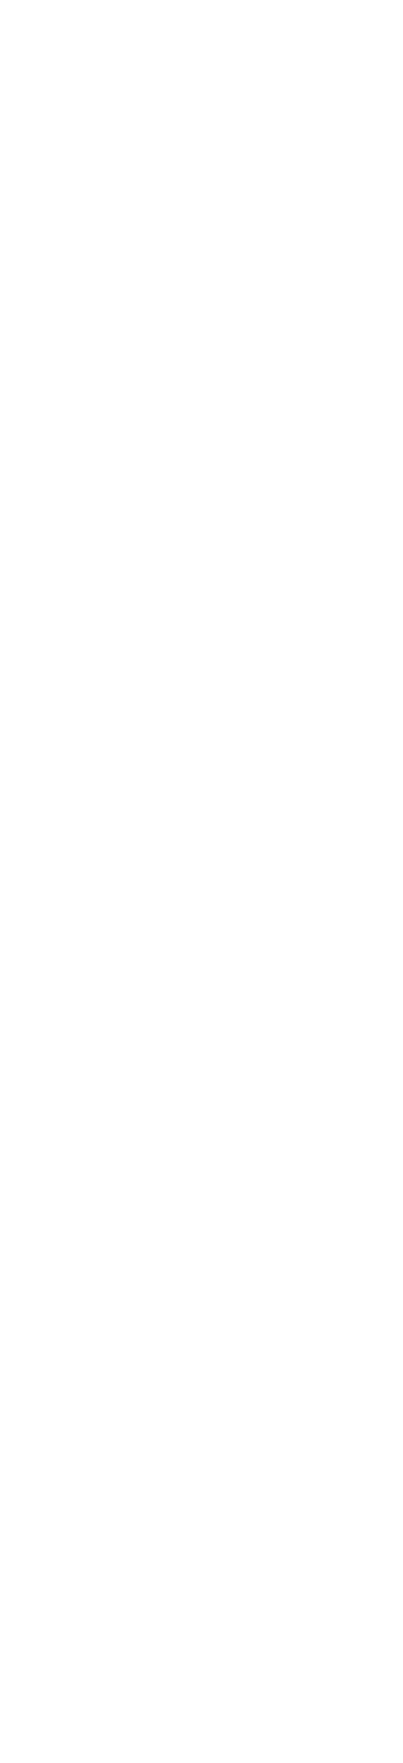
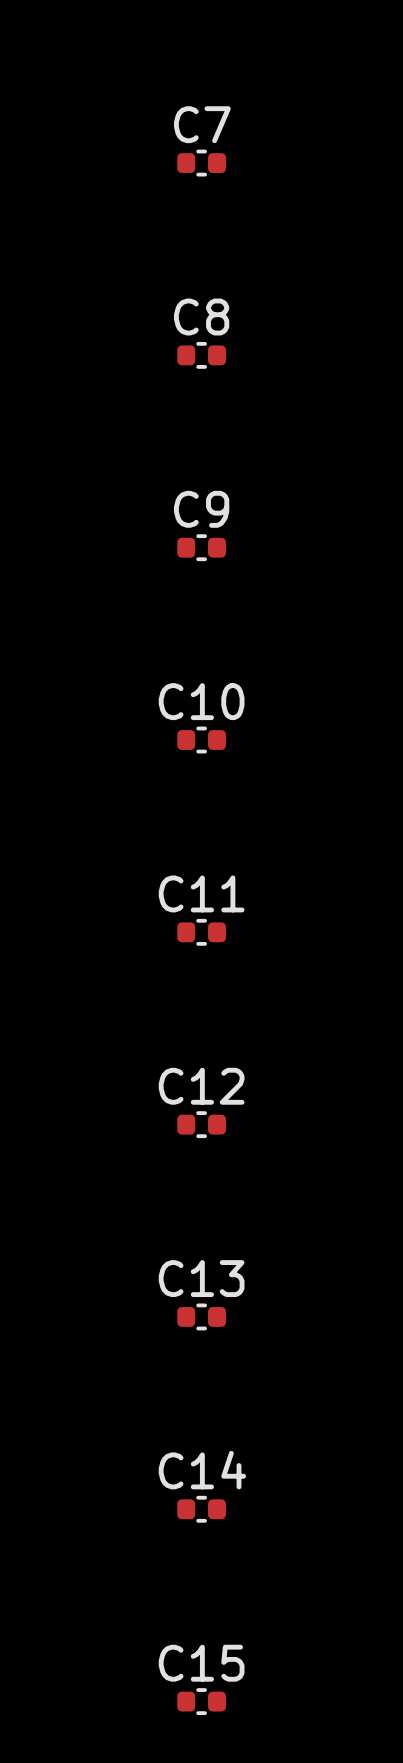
C7: none -> (201, 163)
C8: none -> (201, 355)
C9: none -> (201, 547)
C10: none -> (201, 740)
C11: none -> (201, 932)
C12: none -> (201, 1124)
C13: none -> (201, 1316)
C14: none -> (201, 1509)
C15: none -> (201, 1701)

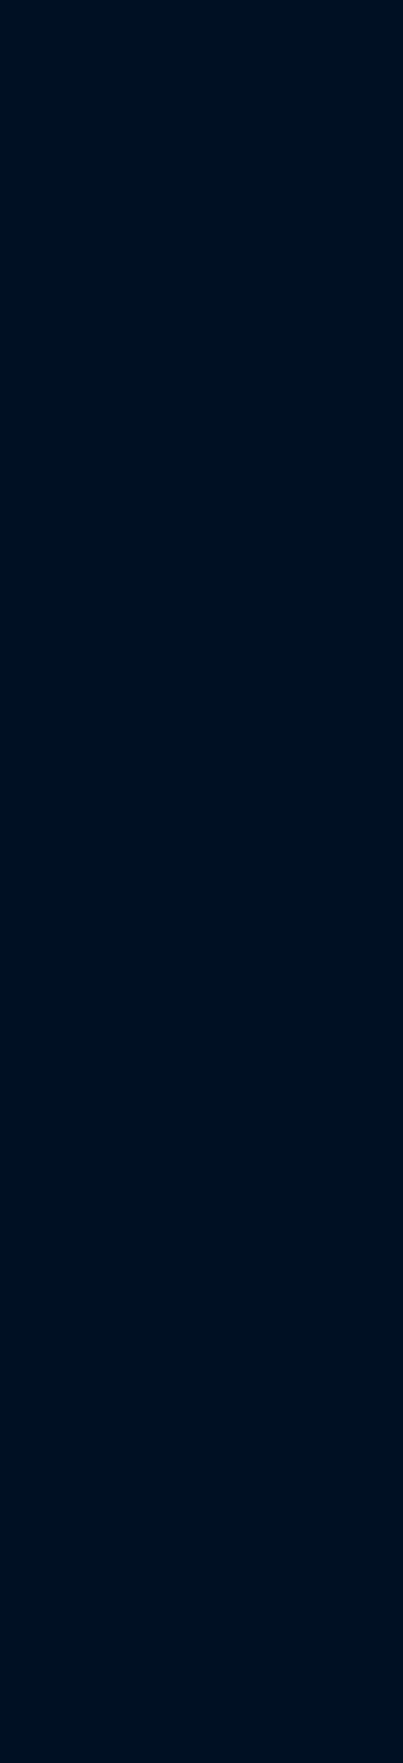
C7: (201, 163) -> none
C8: (201, 355) -> none
C9: (201, 547) -> none
C10: (201, 740) -> none
C11: (201, 932) -> none
C12: (201, 1124) -> none
C13: (201, 1316) -> none
C14: (201, 1509) -> none
C15: (201, 1701) -> none

